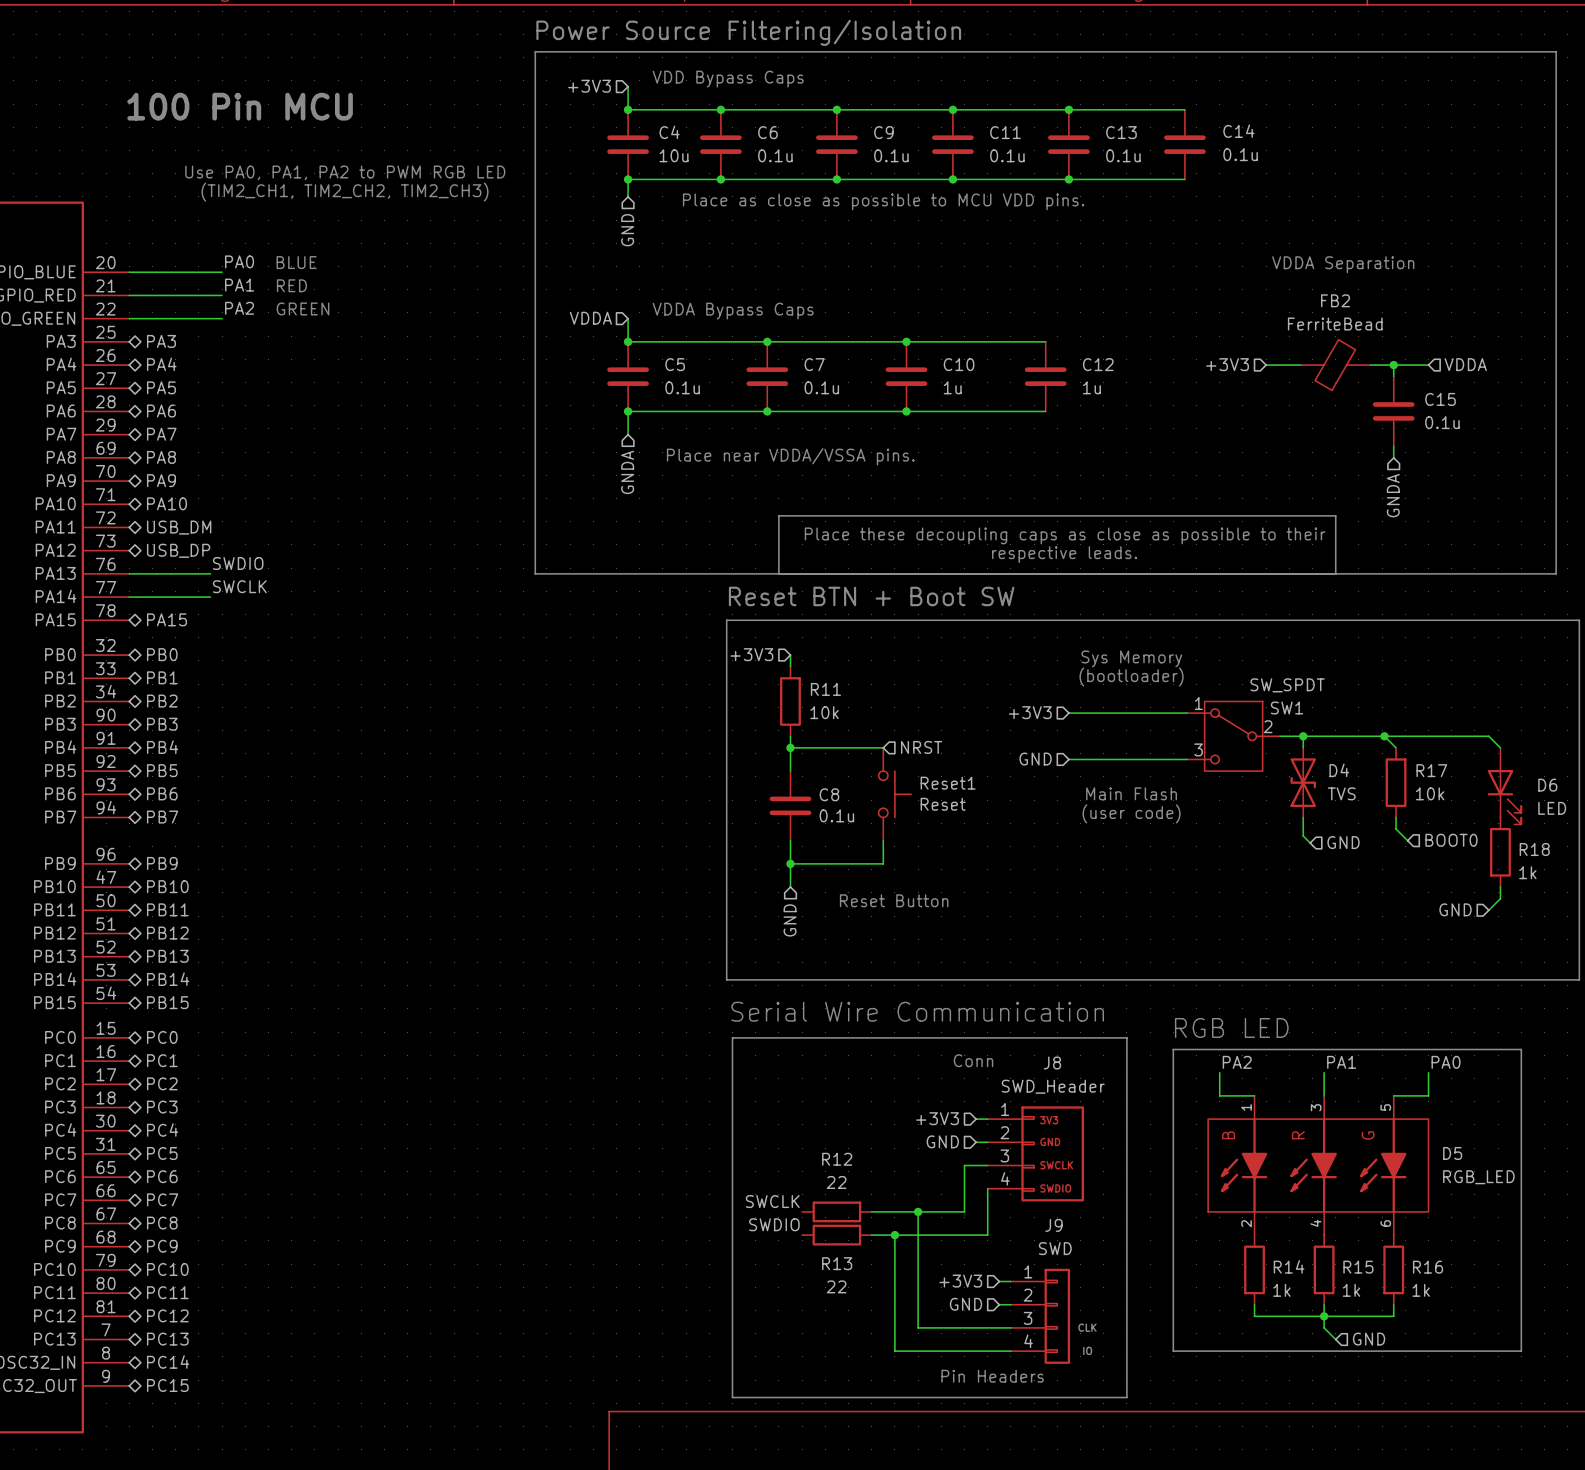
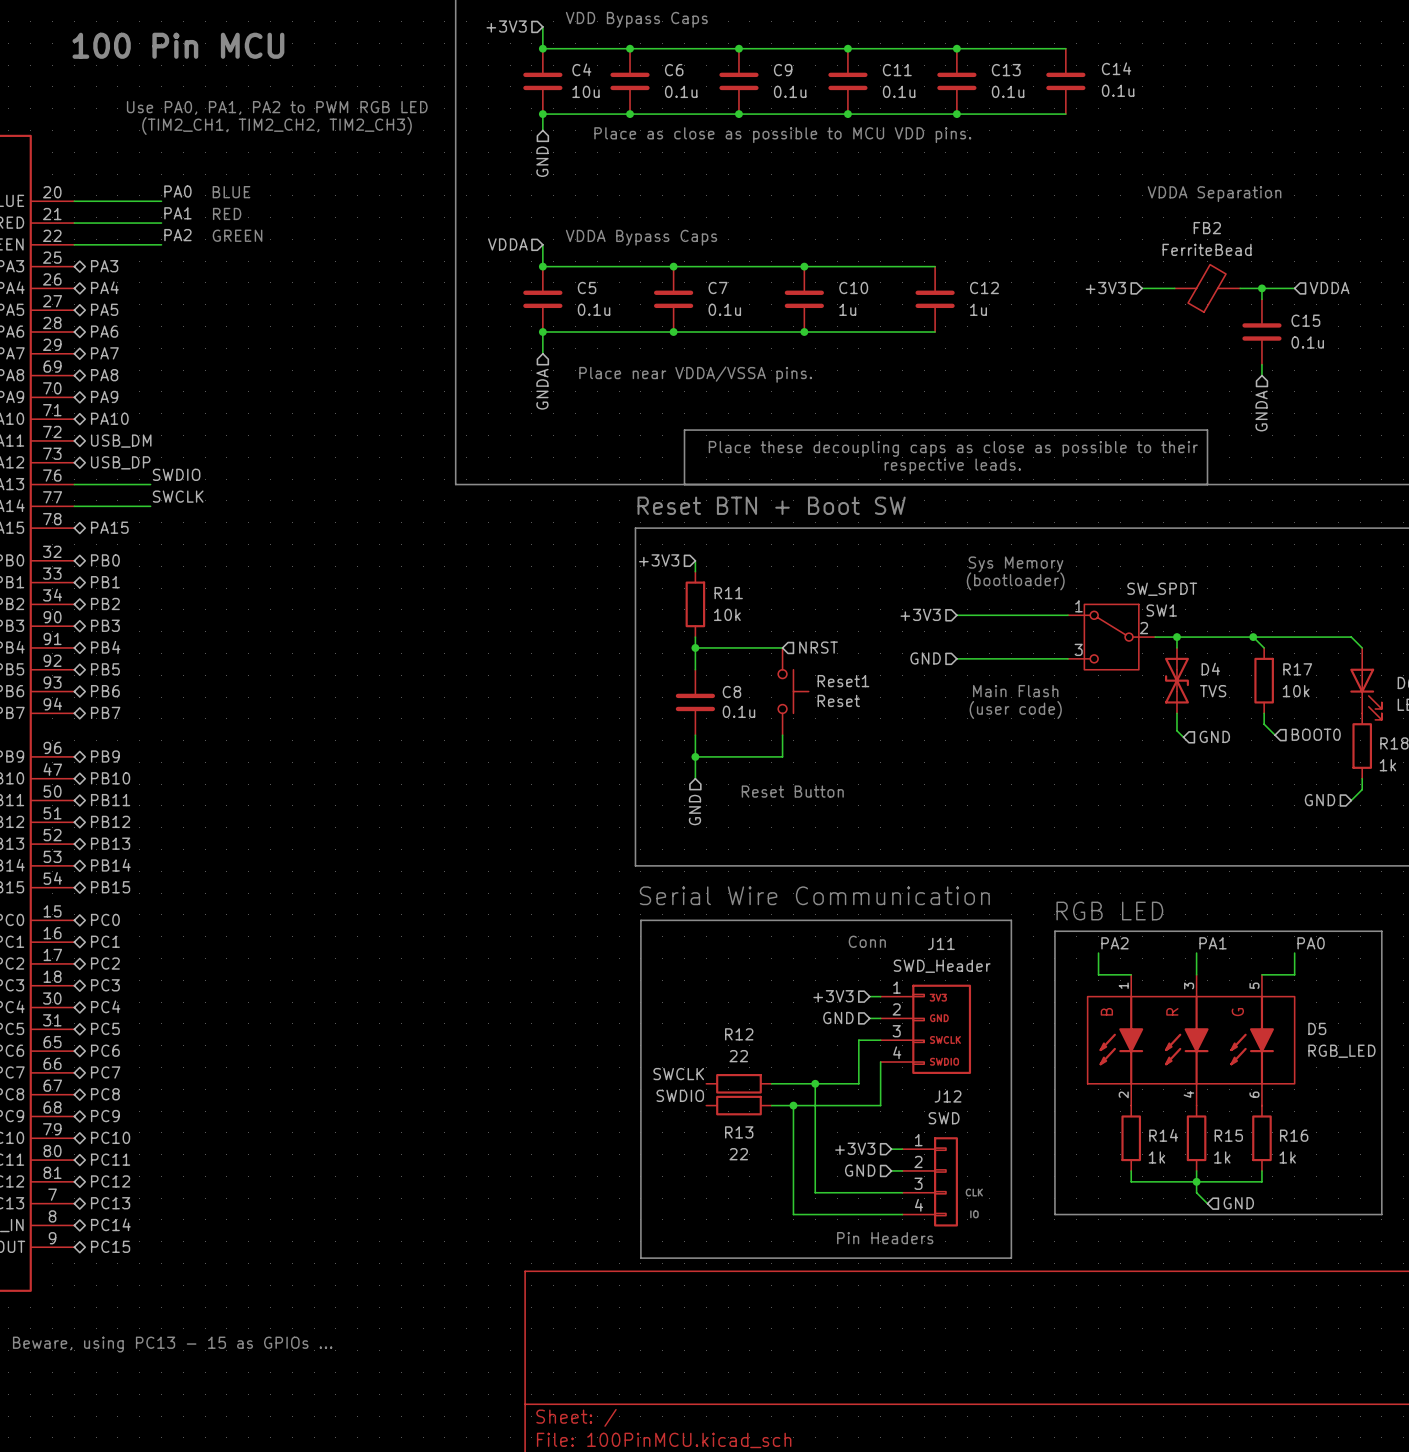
J8 name: J8 (1052, 1062) -> J11 (941, 943)
J9 name: J9 (1053, 1225) -> J12 (948, 1096)

